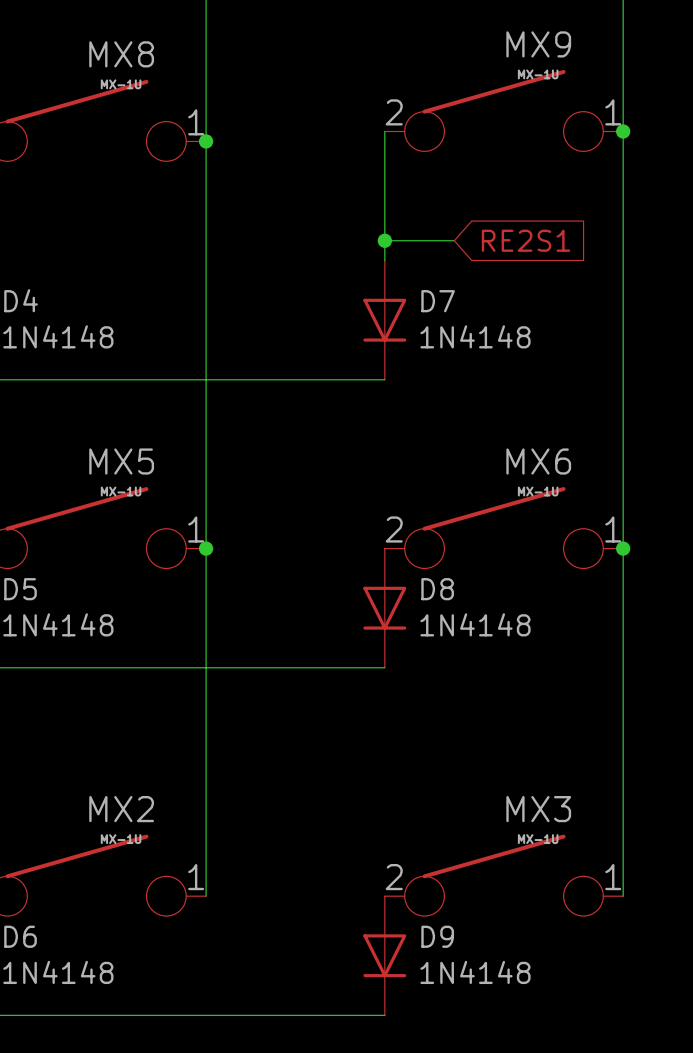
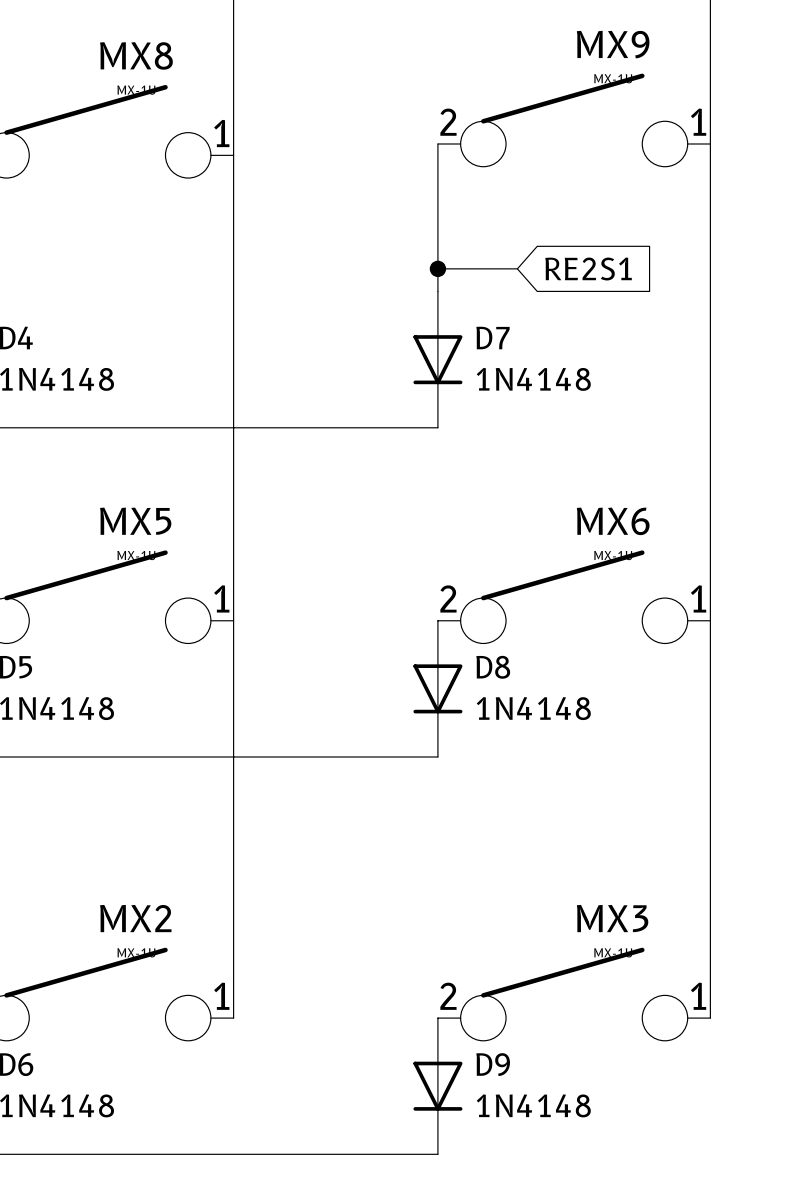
junction: (623, 131) -> none
junction: (206, 141) -> none
junction: (206, 548) -> none
junction: (623, 548) -> none

